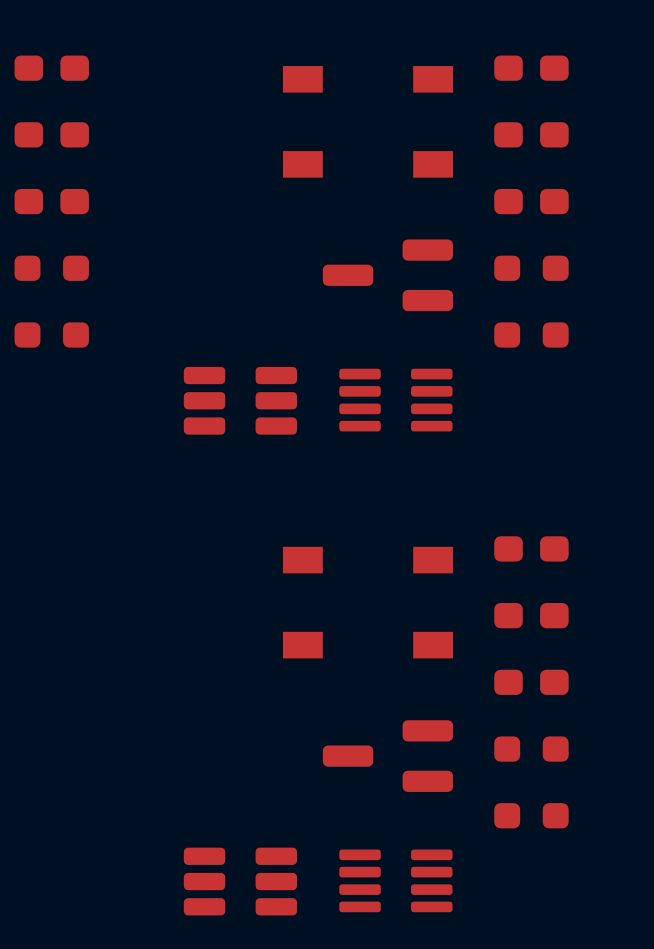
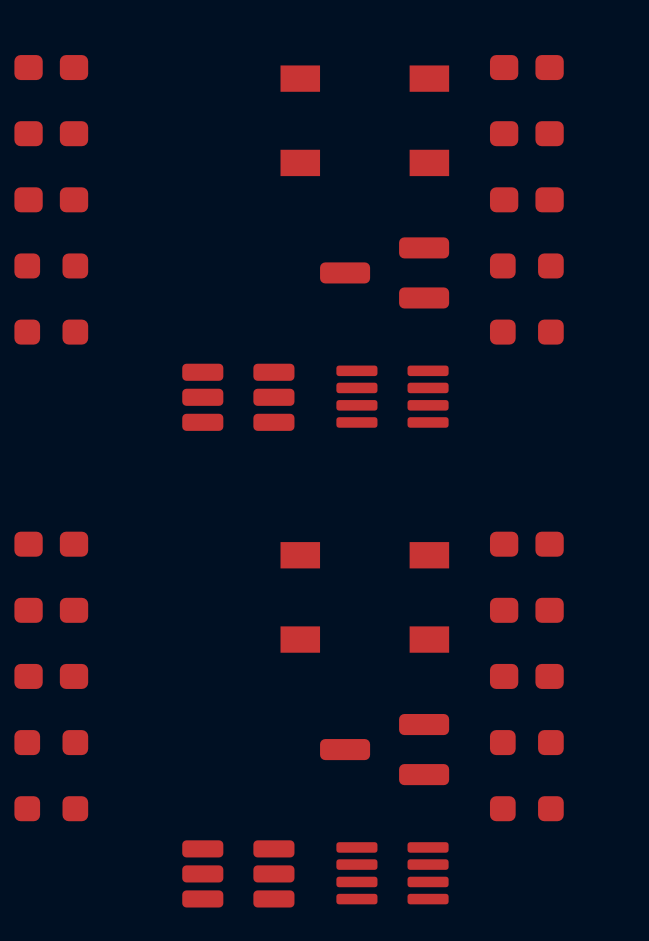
part: none -> (51, 544)
part: none -> (51, 610)
part: none -> (51, 676)
part: none -> (51, 742)
part: none -> (51, 808)

